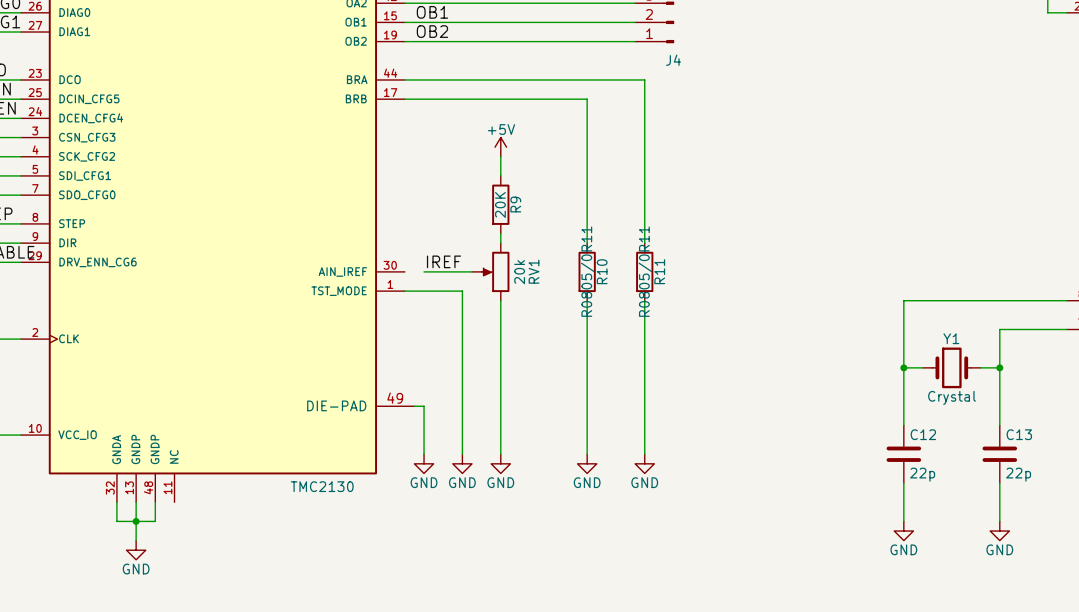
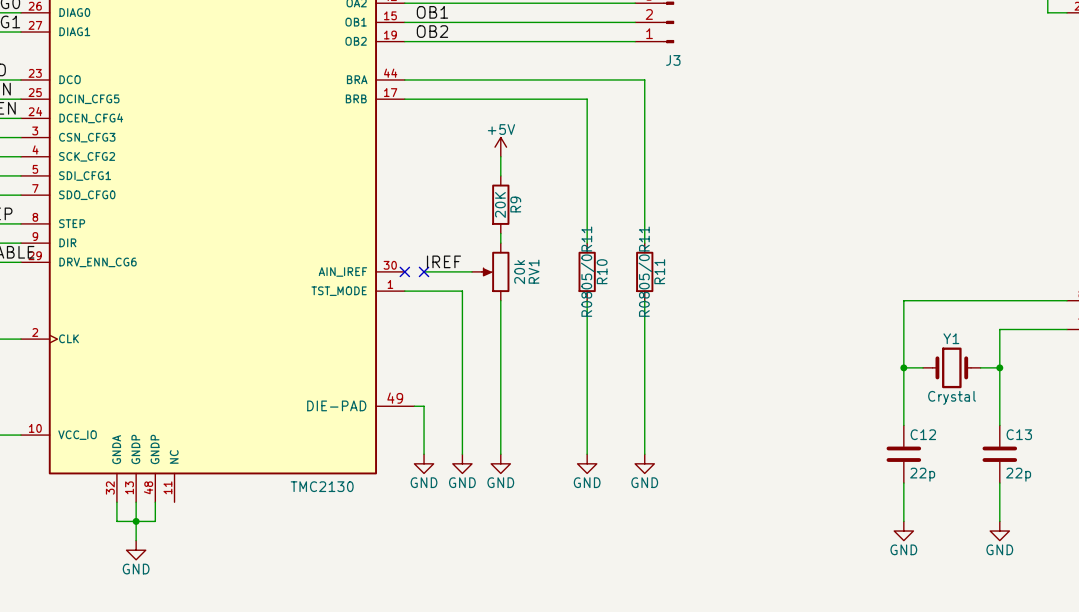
J4 name: J4 (673, 60) -> J3 (673, 60)
no-connect mark: none -> (404, 271)
no-connect mark: none -> (424, 271)

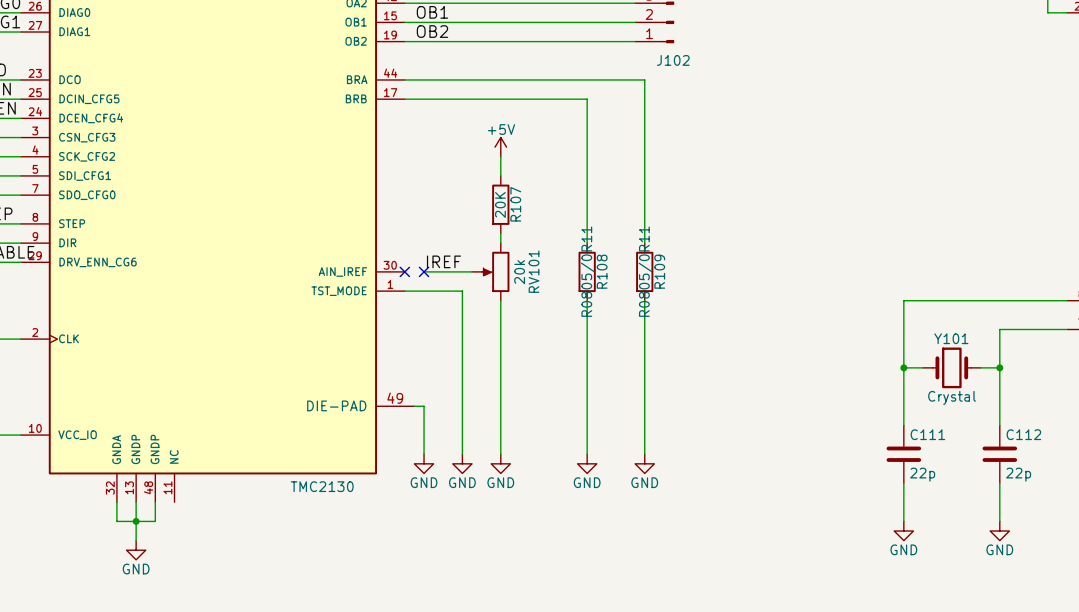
J3 name: J3 (673, 60) -> J102 (673, 60)
R9 name: R9 (515, 204) -> R107 (515, 204)
RV1 name: RV1 (534, 271) -> RV101 (534, 271)
R10 name: R10 (602, 271) -> R108 (602, 271)
R11 name: R11 (659, 271) -> R109 (659, 271)
Y1 name: Y1 (951, 338) -> Y101 (951, 338)
C12 name: C12 (923, 434) -> C111 (927, 434)
C13 name: C13 (1019, 434) -> C112 (1023, 434)

